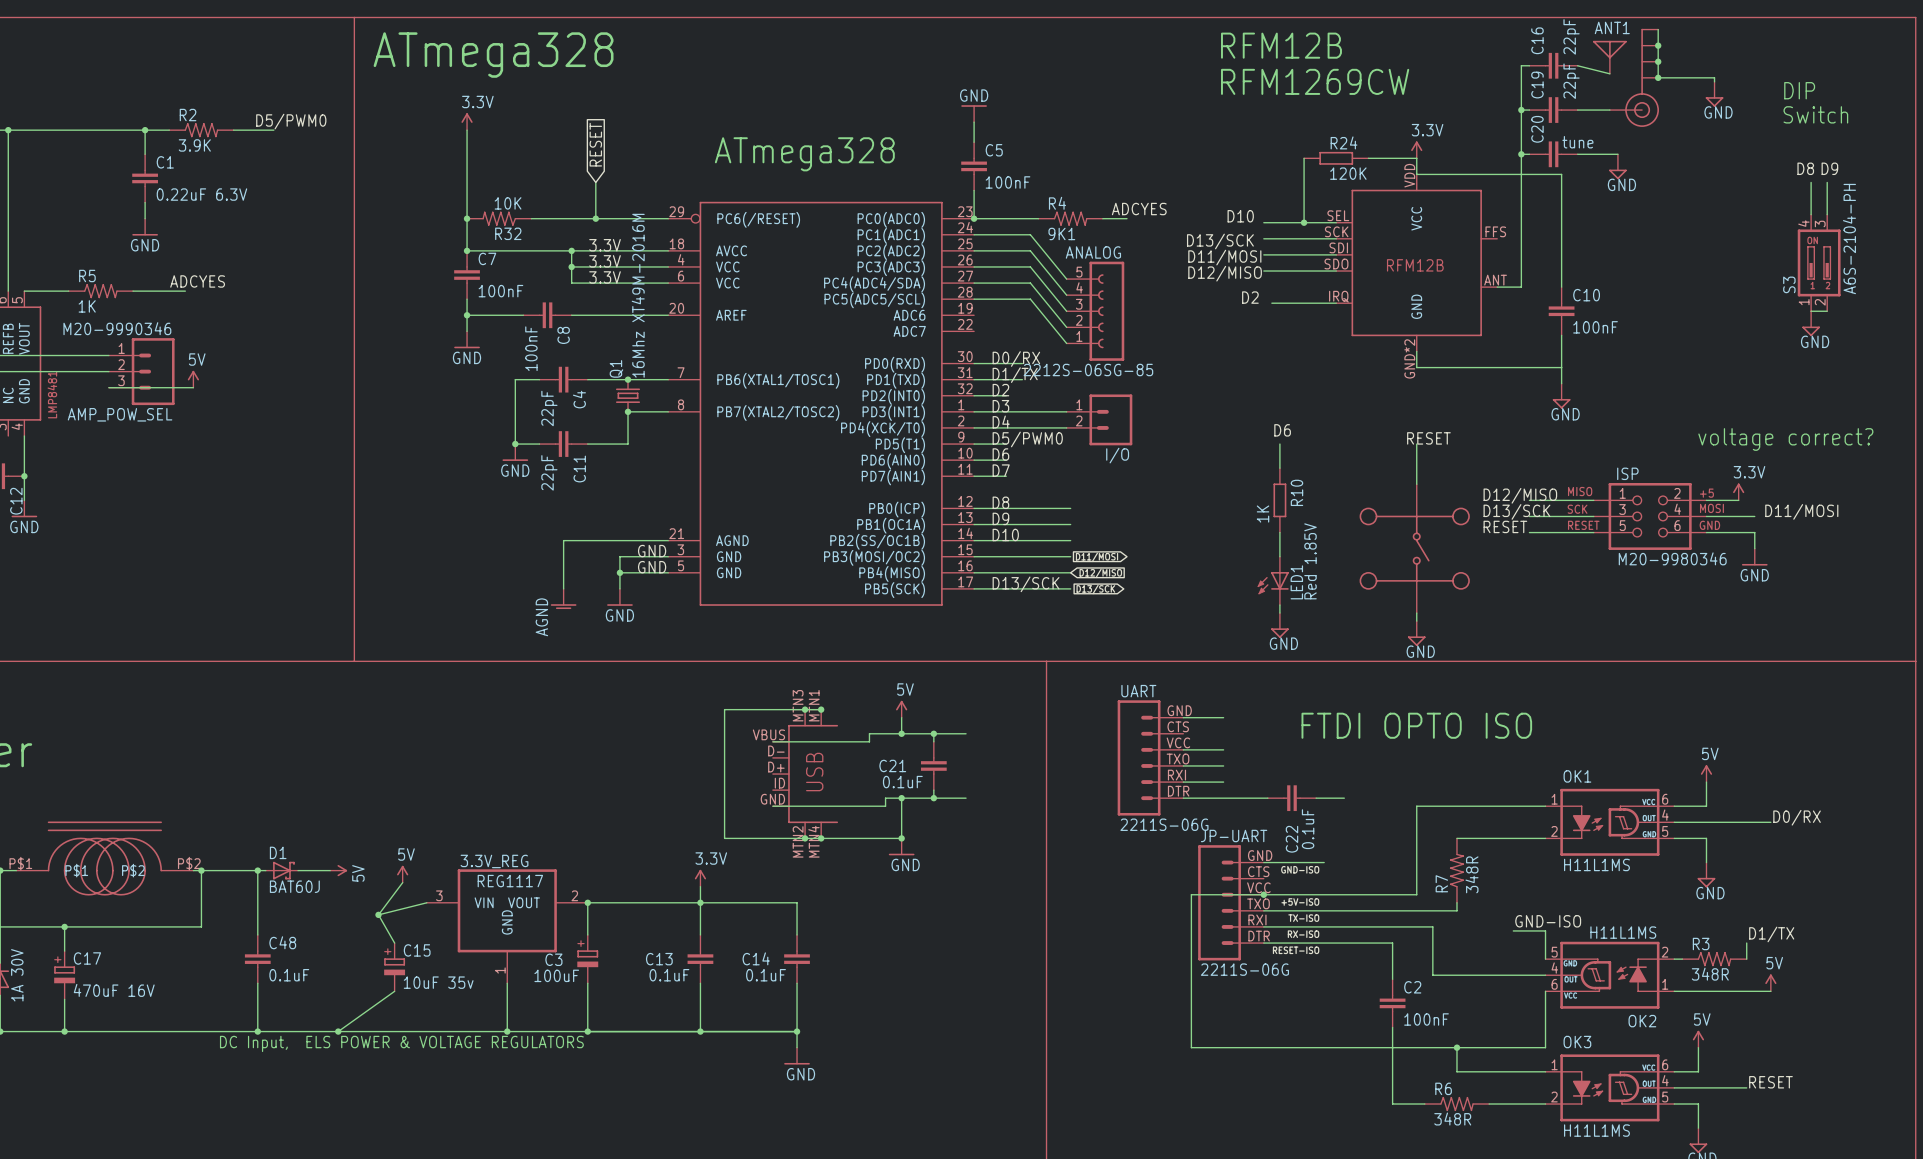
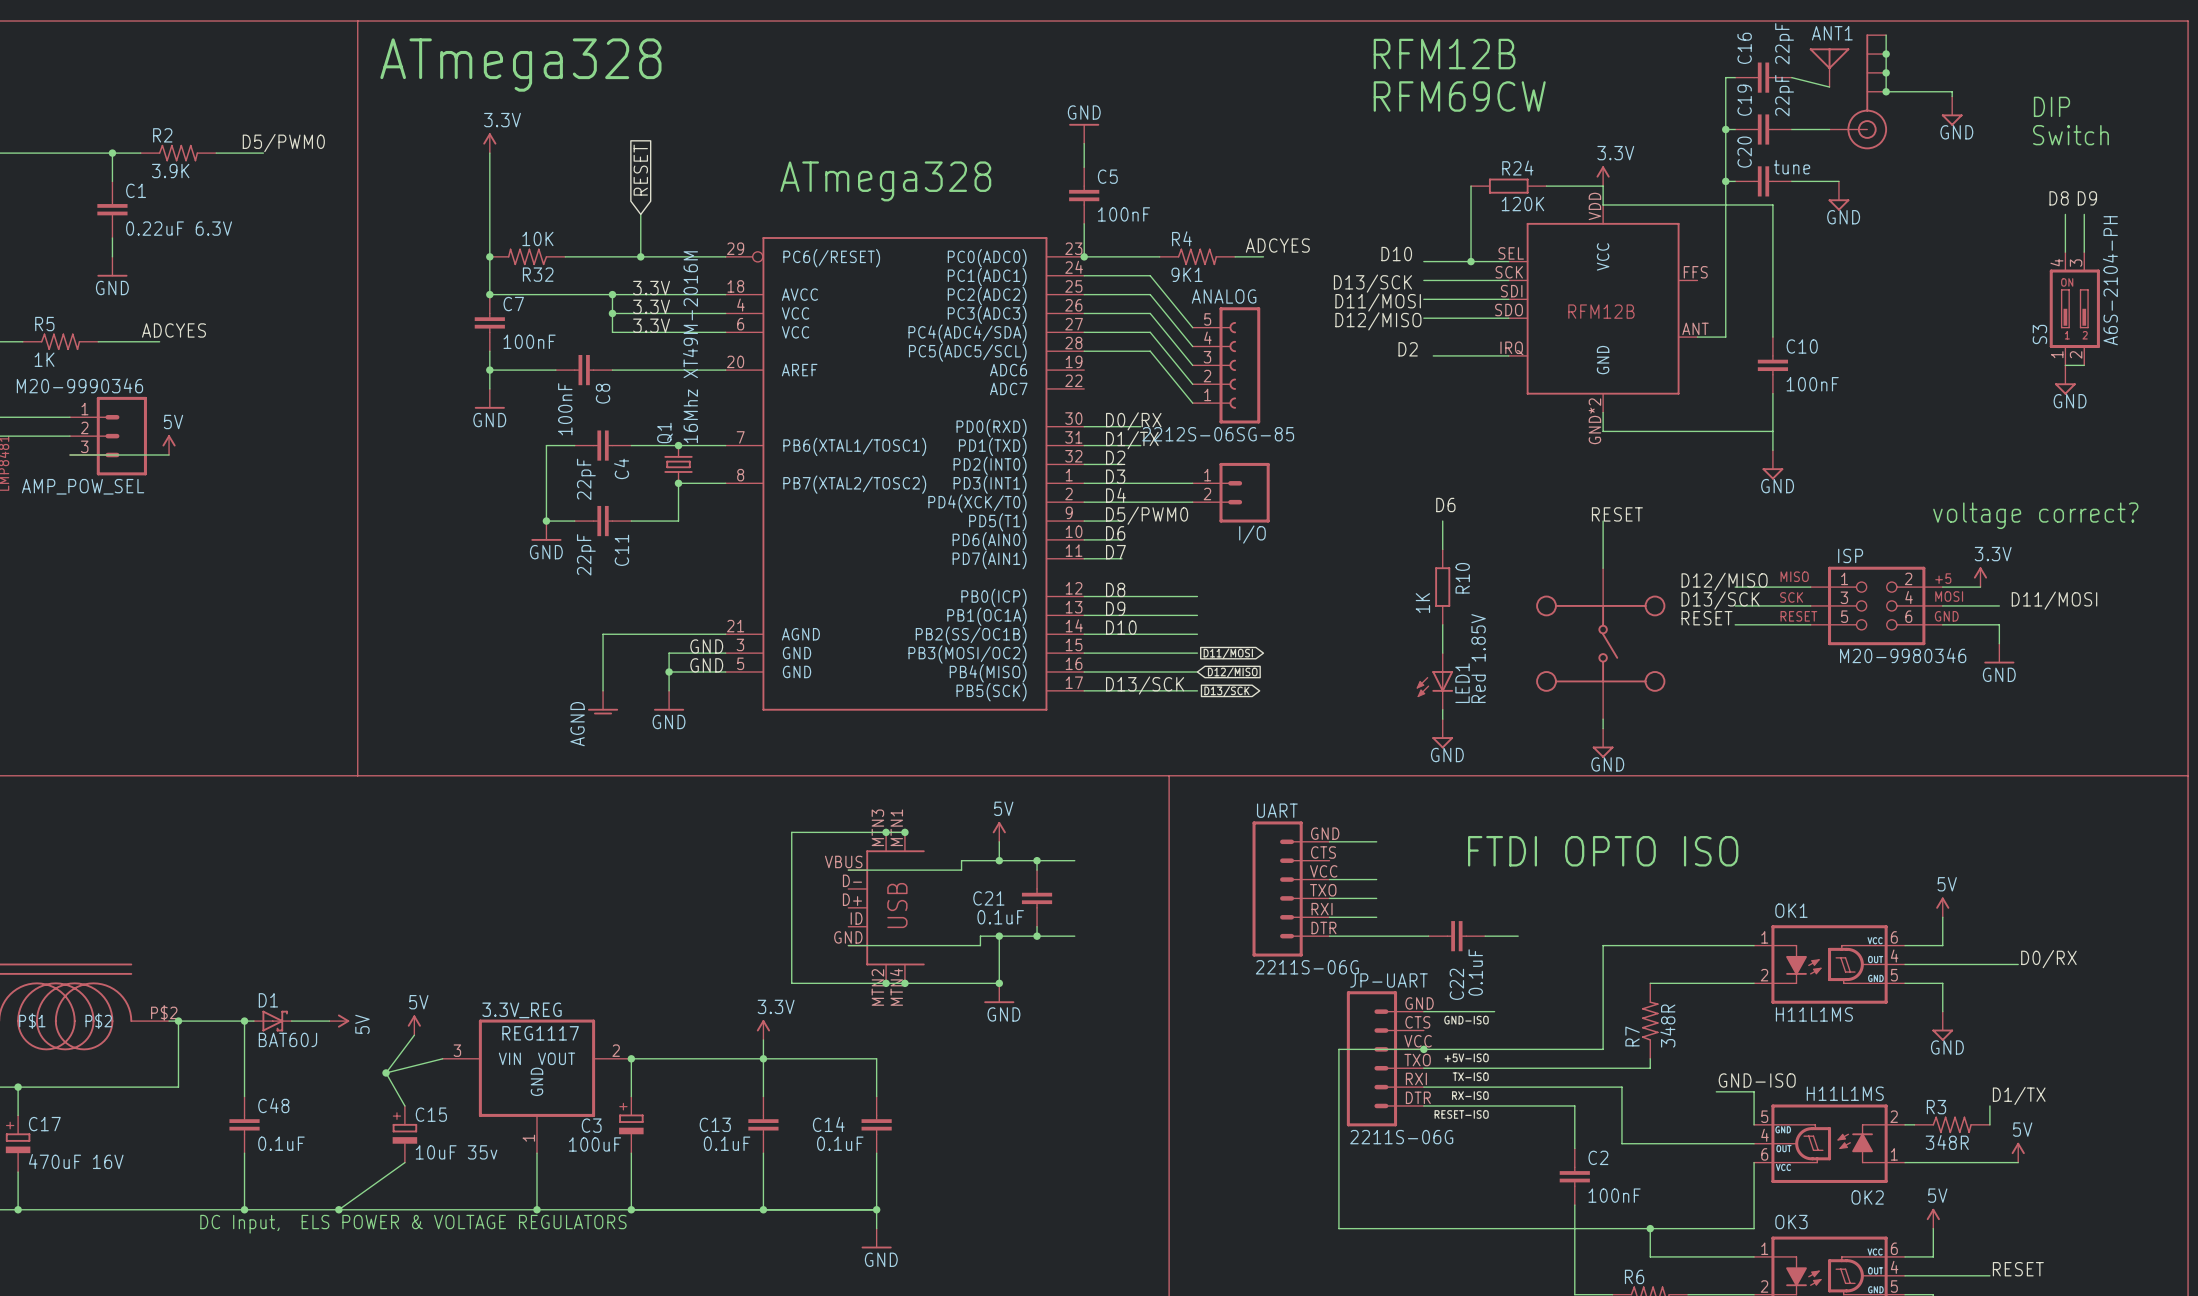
text: RFM1269CW (1315, 81) -> RFM69CW (1459, 96)

